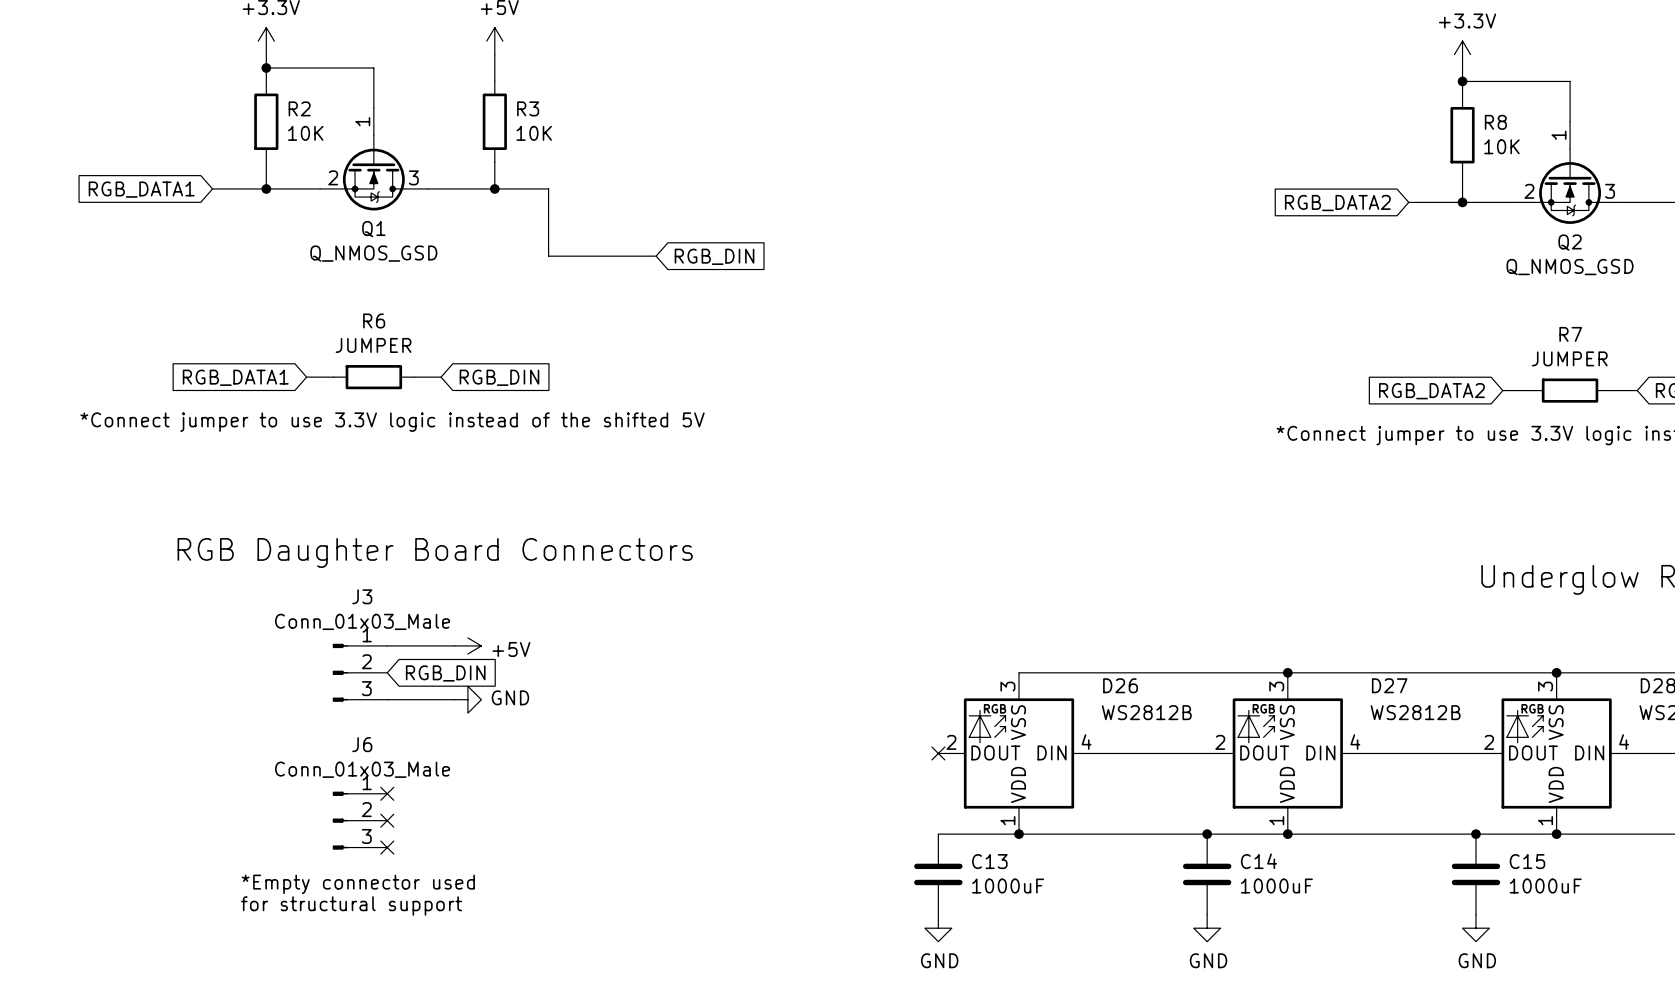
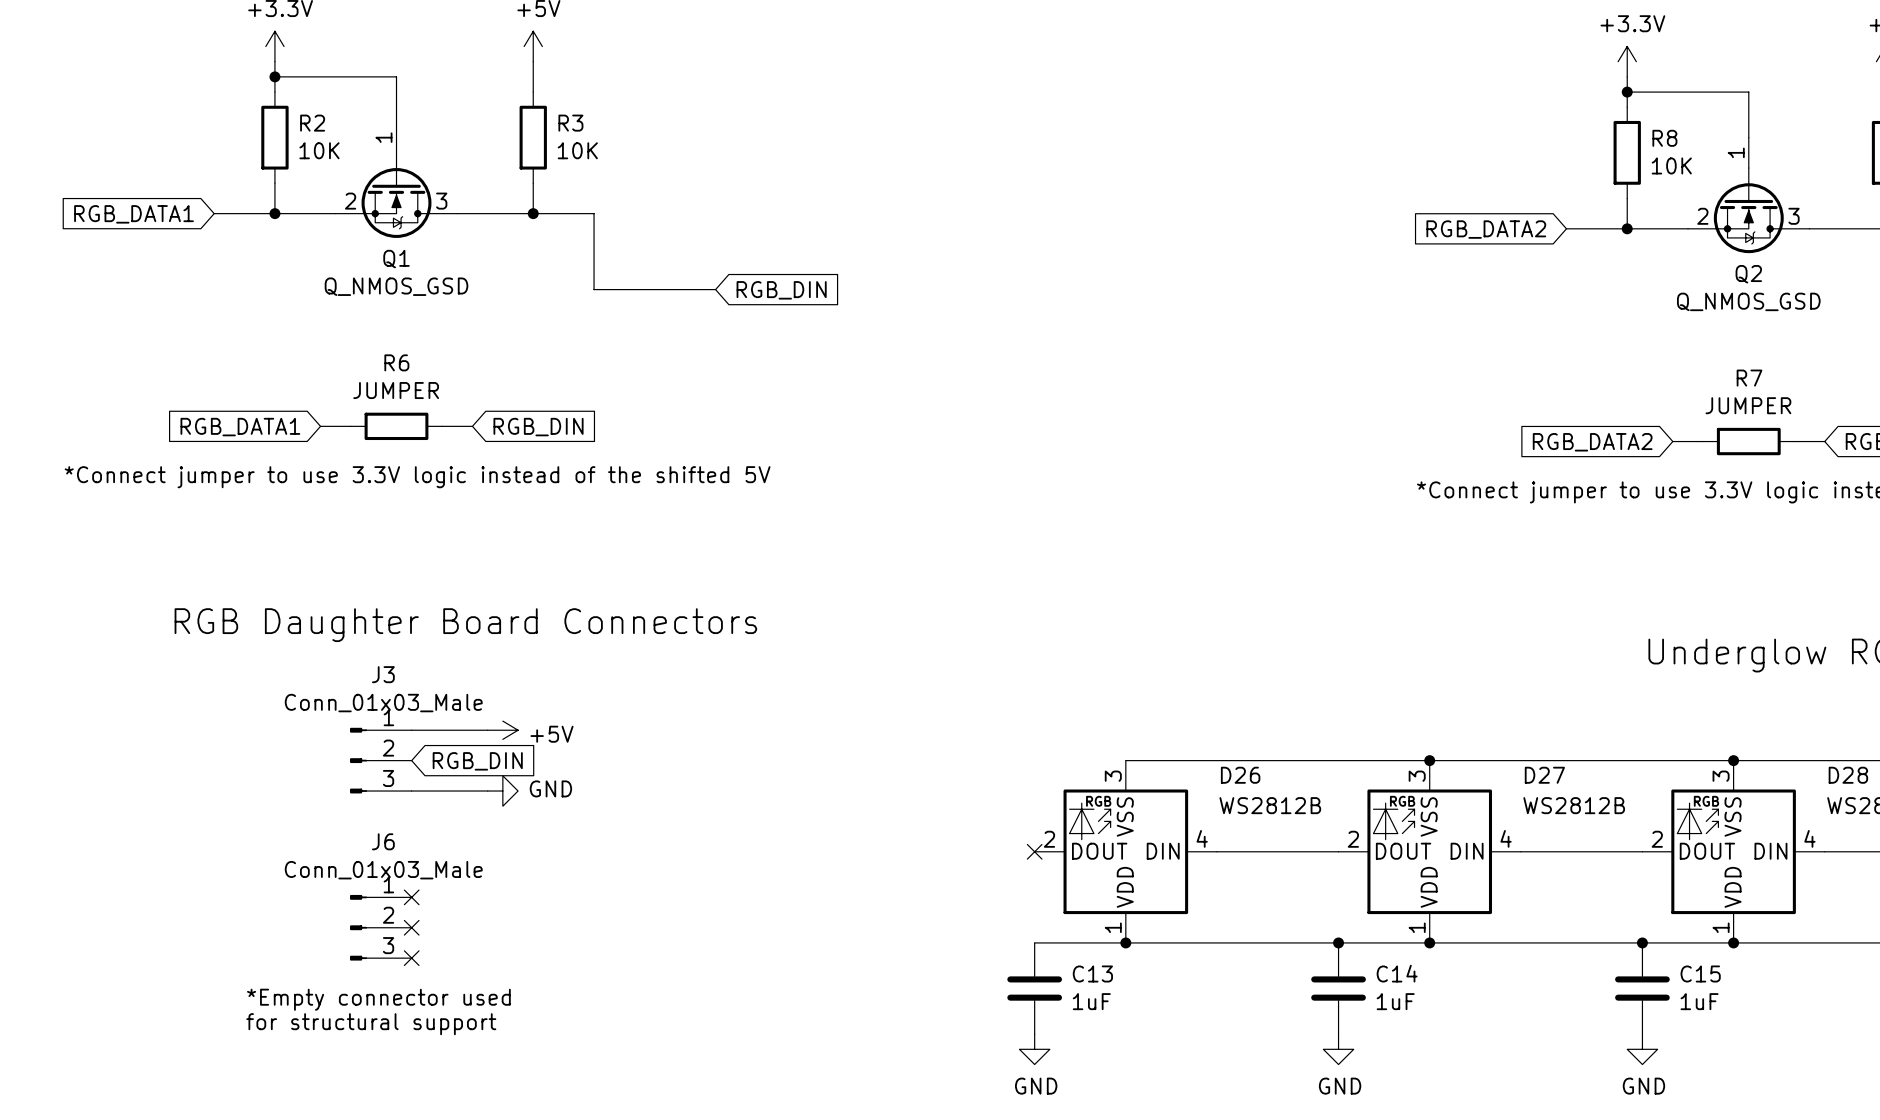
C13 value: 1000uF (1008, 886) -> 1uF (1091, 1001)
C14 value: 1000uF (1276, 886) -> 1uF (1395, 1001)
C15 value: 1000uF (1545, 886) -> 1uF (1699, 1001)

